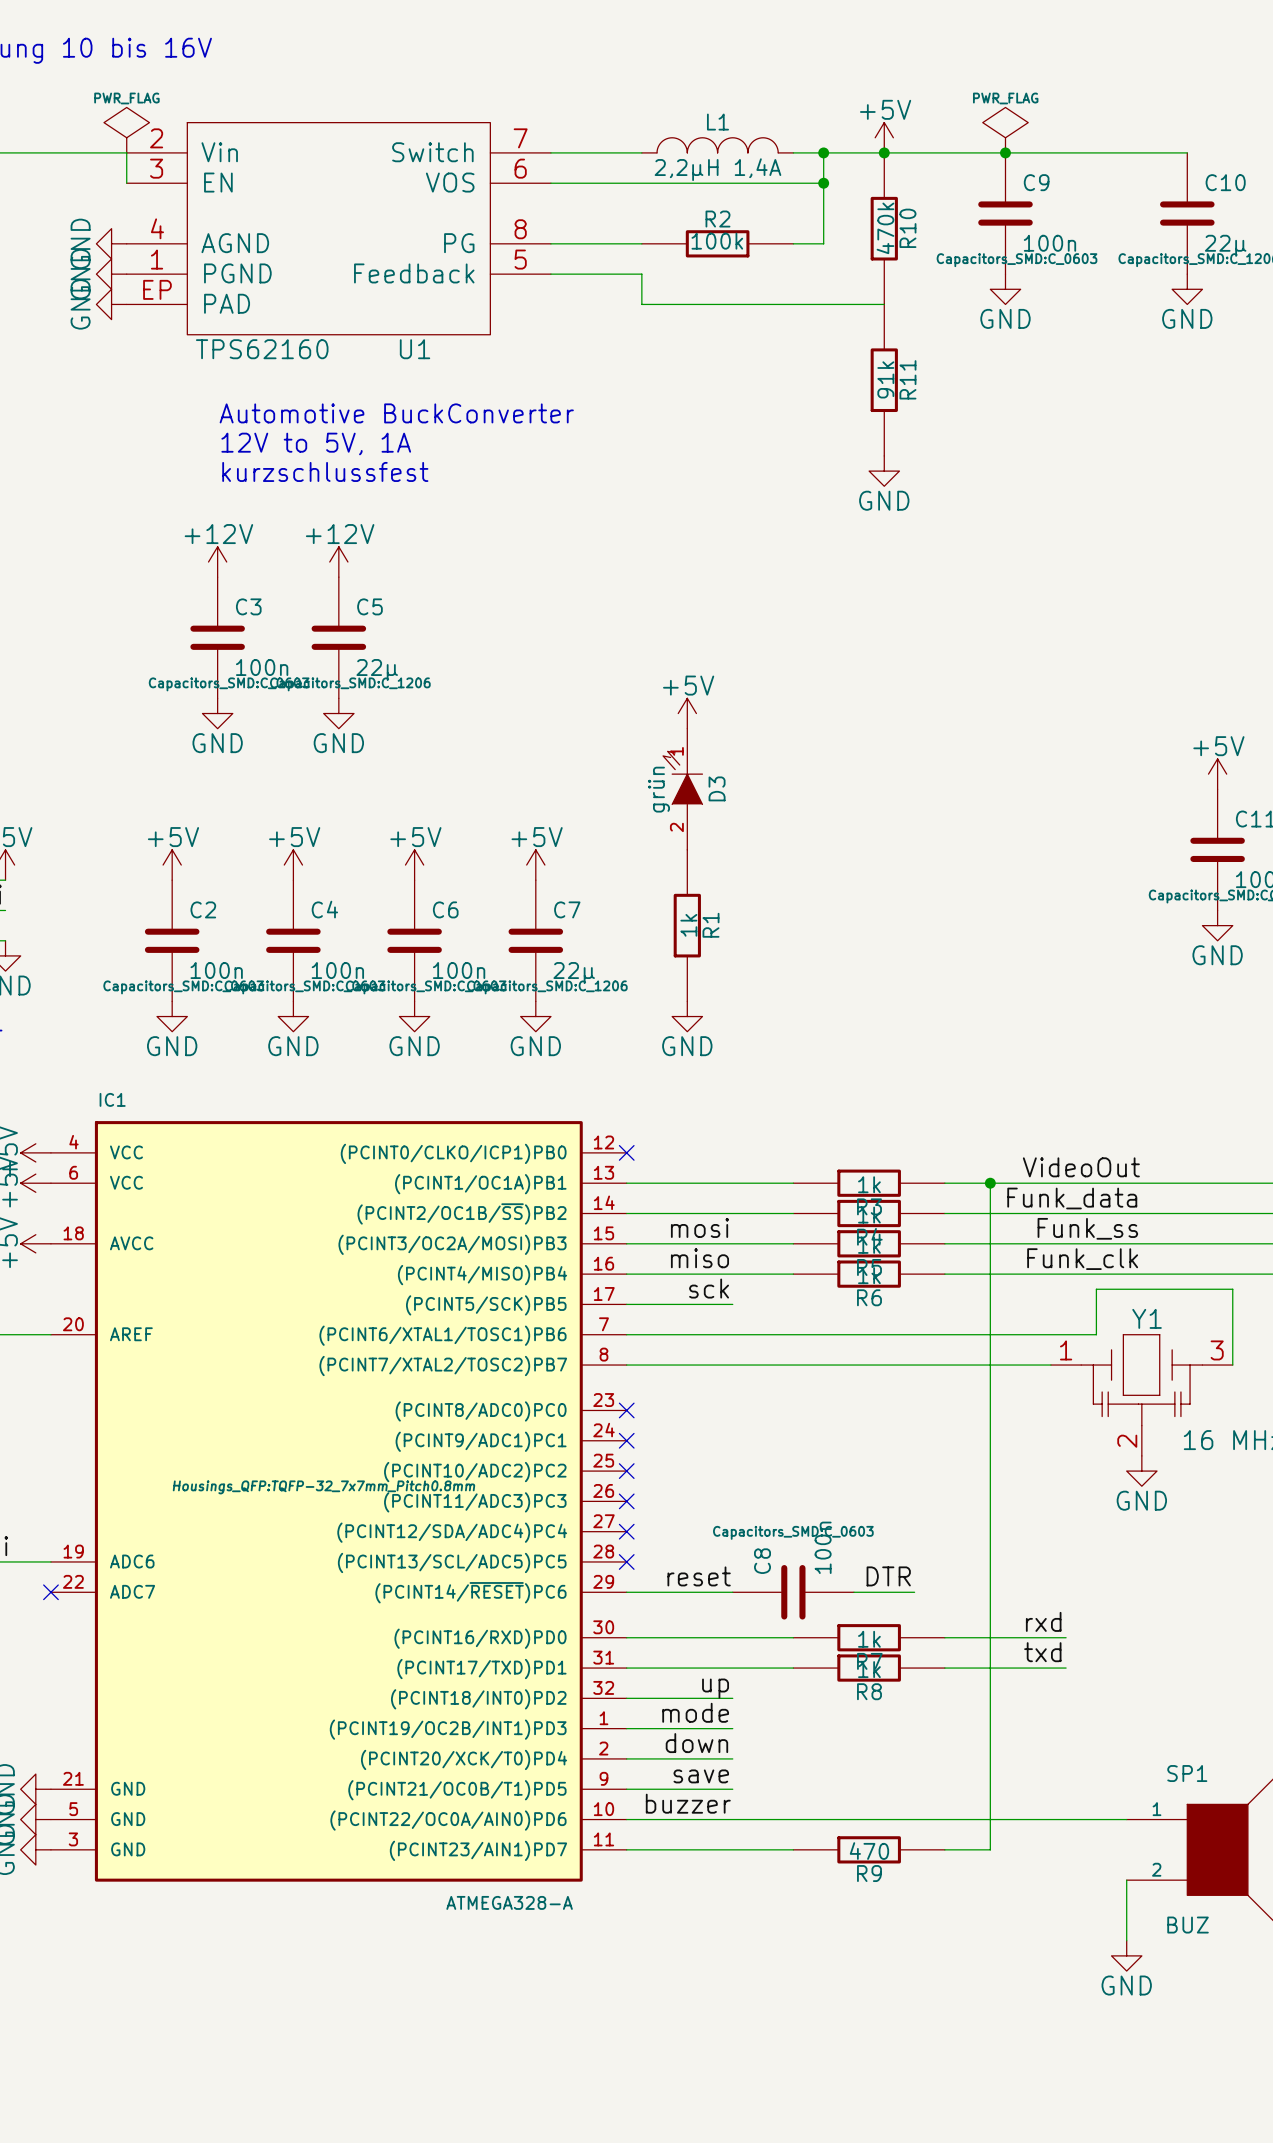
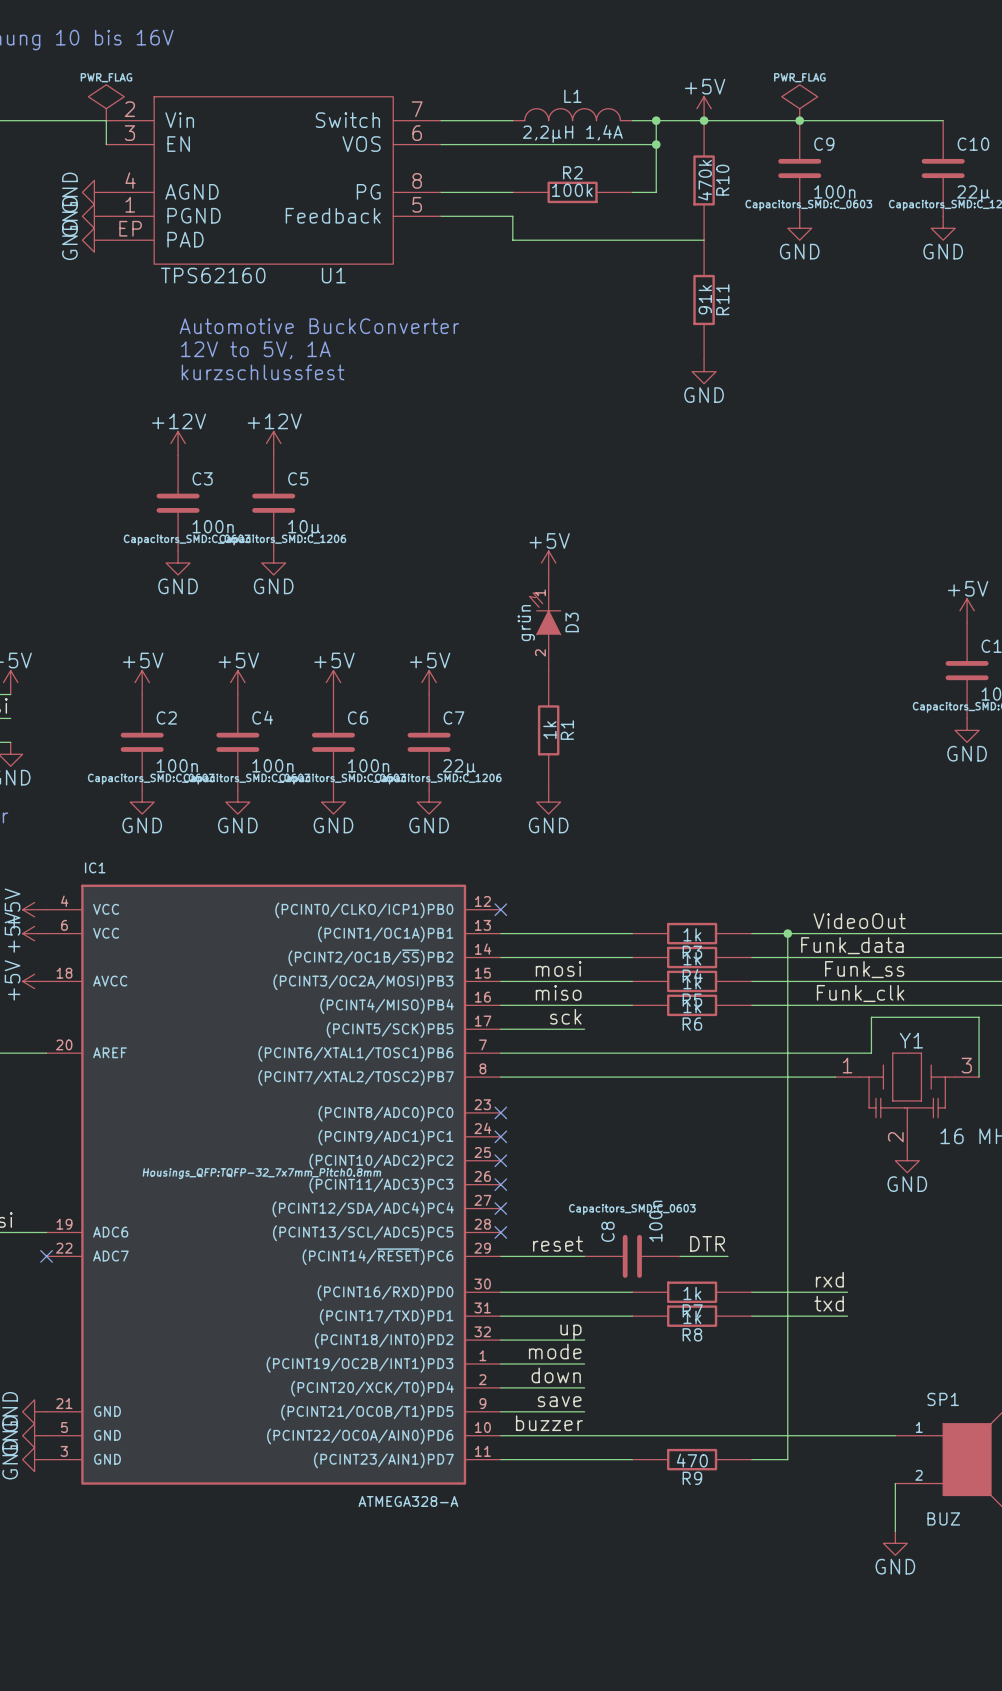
C5 value: 22µ (377, 670) -> 10µ (304, 528)

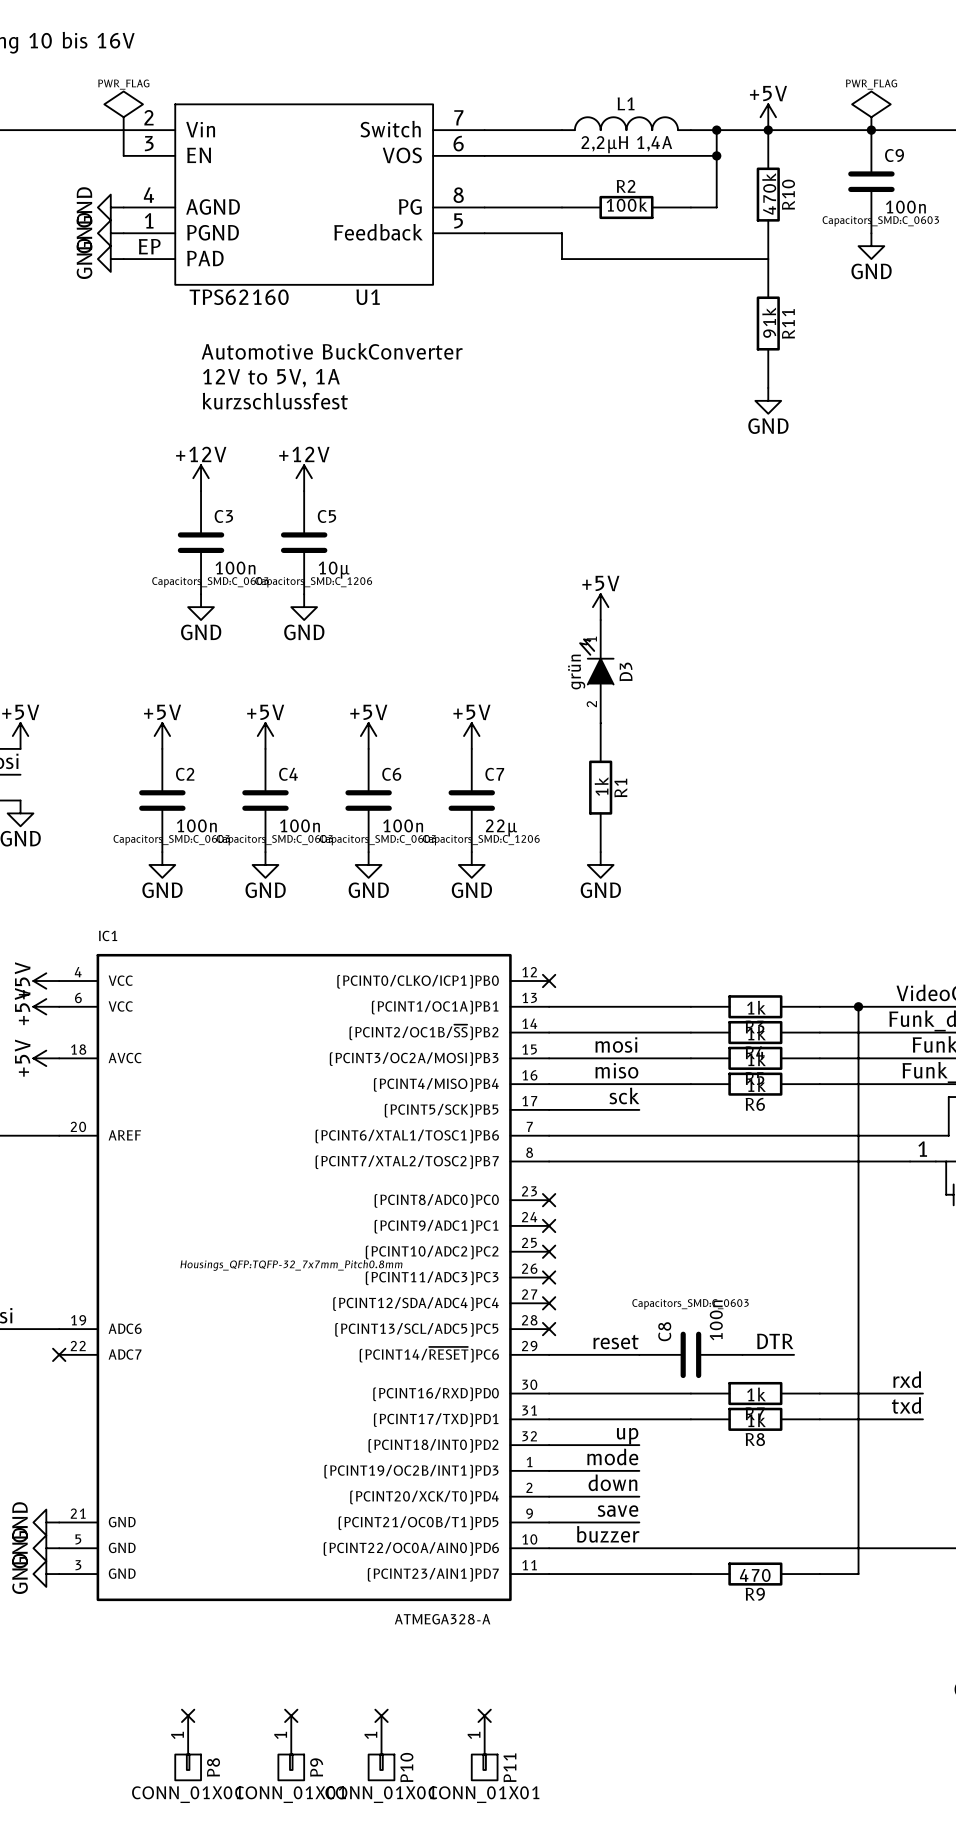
no-connect mark: none -> (188, 1715)
no-connect mark: none -> (291, 1715)
no-connect mark: none -> (381, 1715)
no-connect mark: none -> (484, 1715)
P8: none -> CONN_01X01 (188, 1748)
P9: none -> CONN_01X01 (291, 1748)
P10: none -> CONN_01X01 (381, 1748)
P11: none -> CONN_01X01 (484, 1748)

